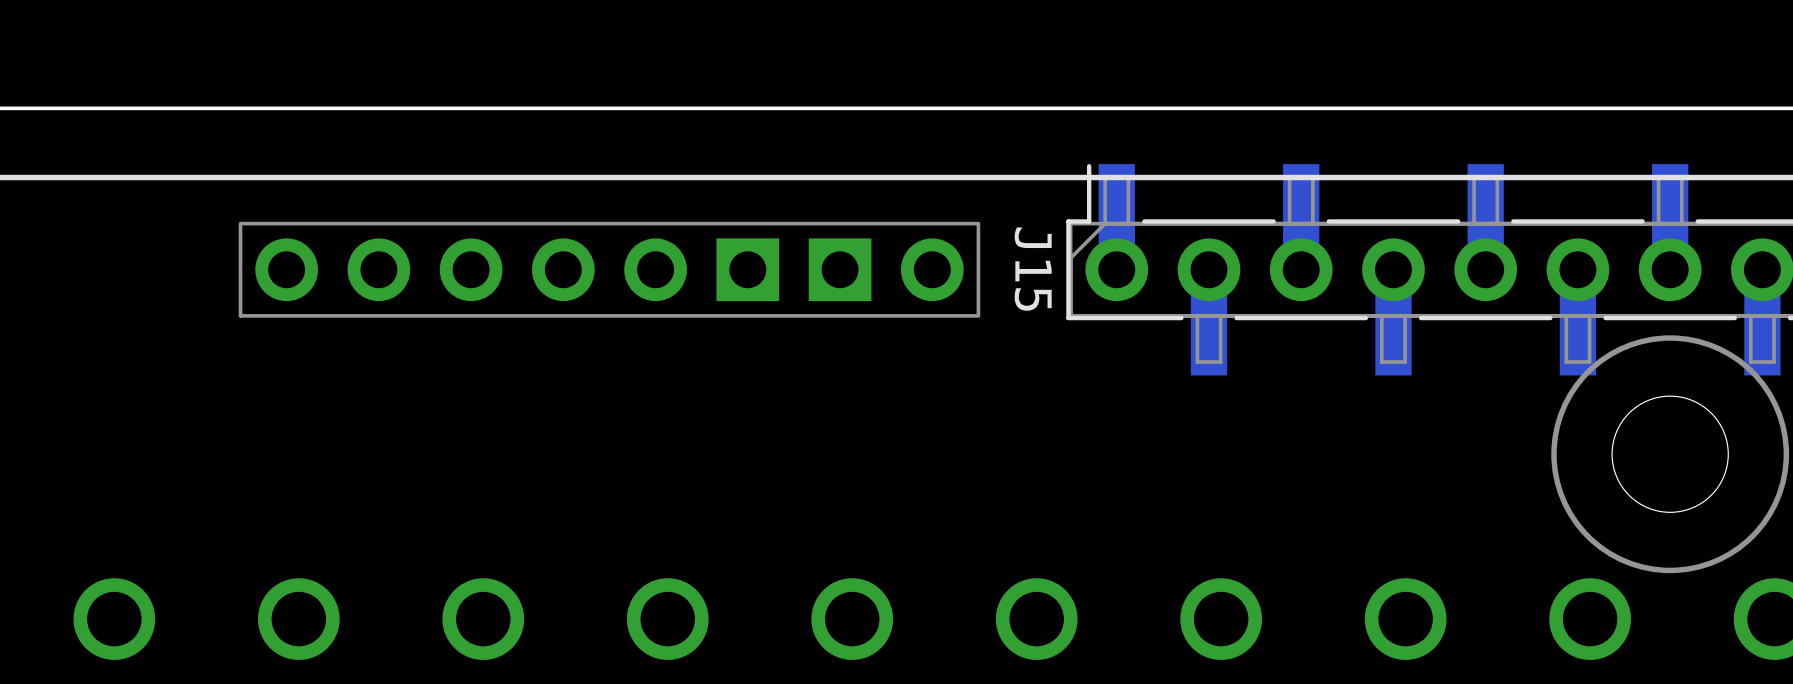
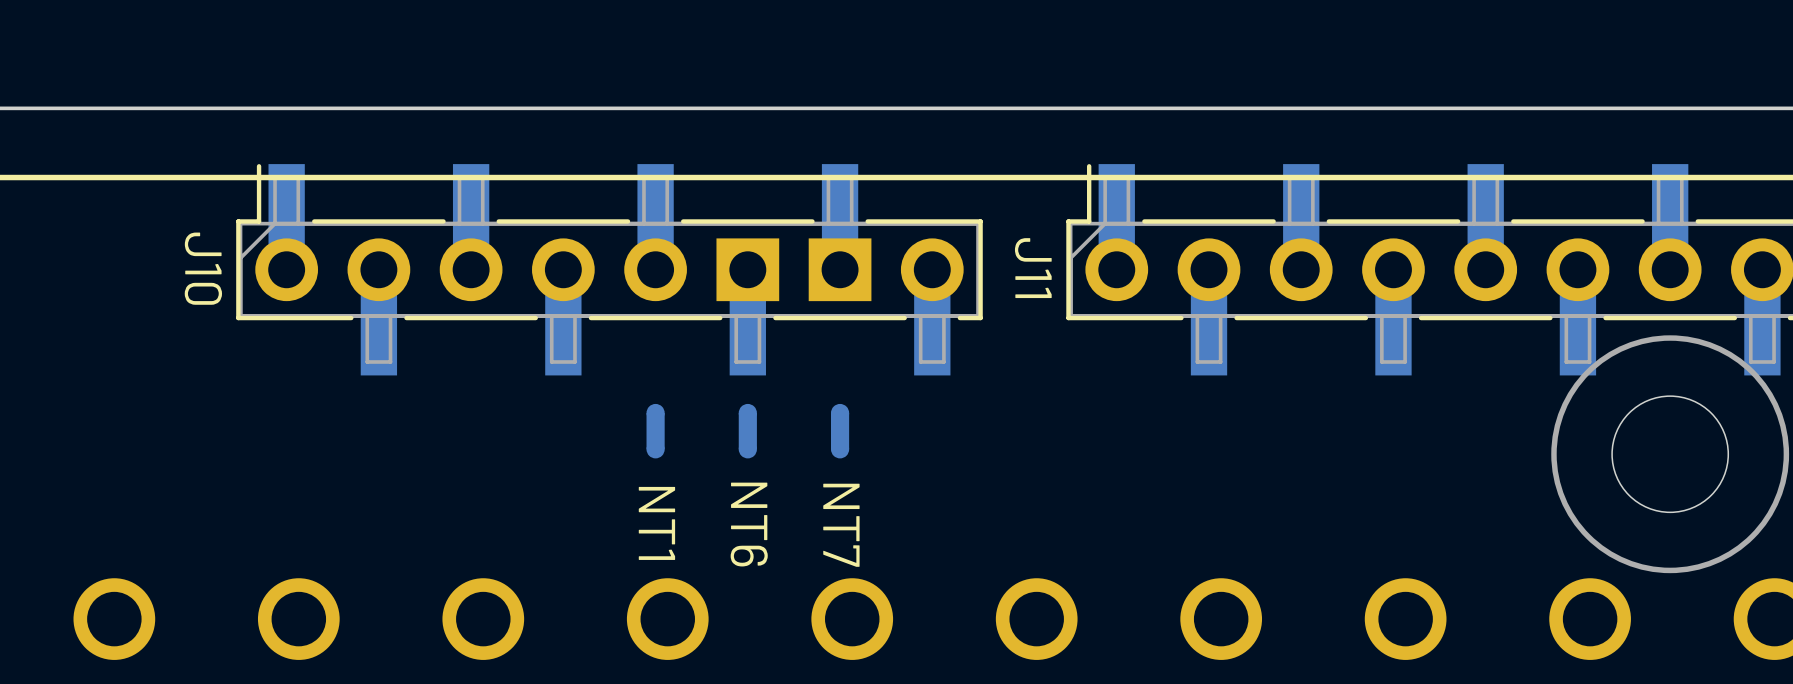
J10: none -> (609, 269)
J15 name: J15 (1033, 269) -> J11 (1033, 268)
NT1: none -> (655, 431)
NT6: none -> (747, 431)
NT7: none -> (840, 431)

